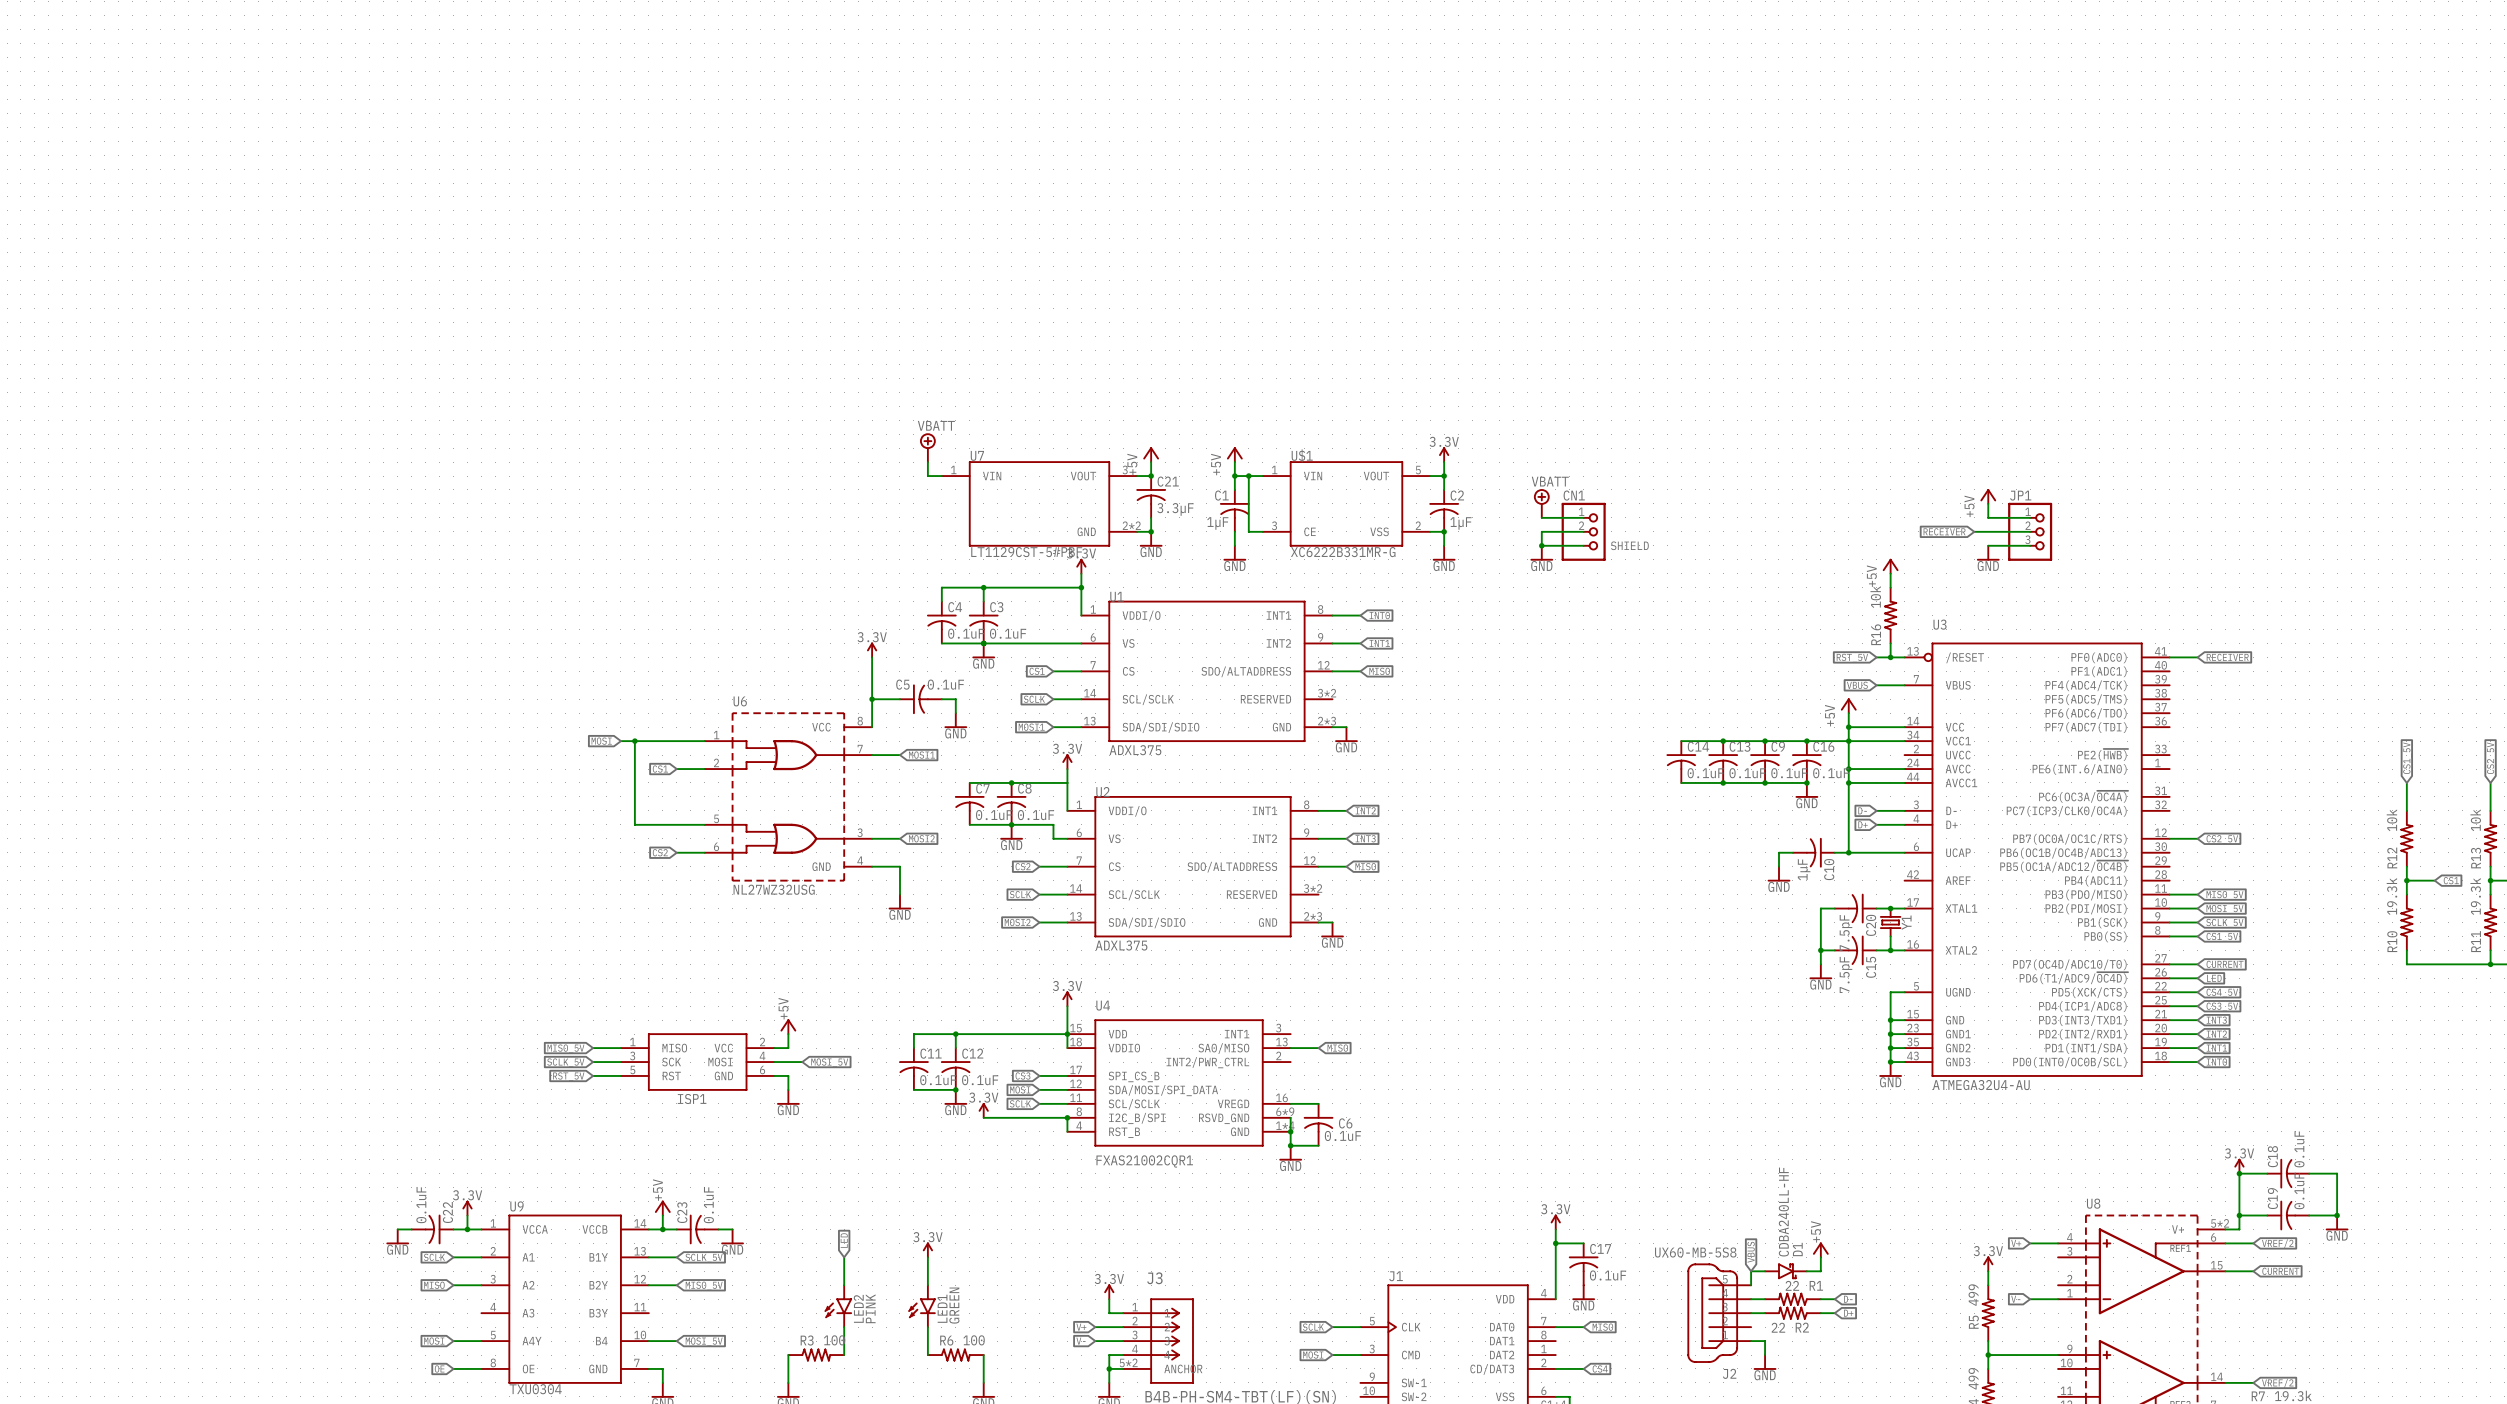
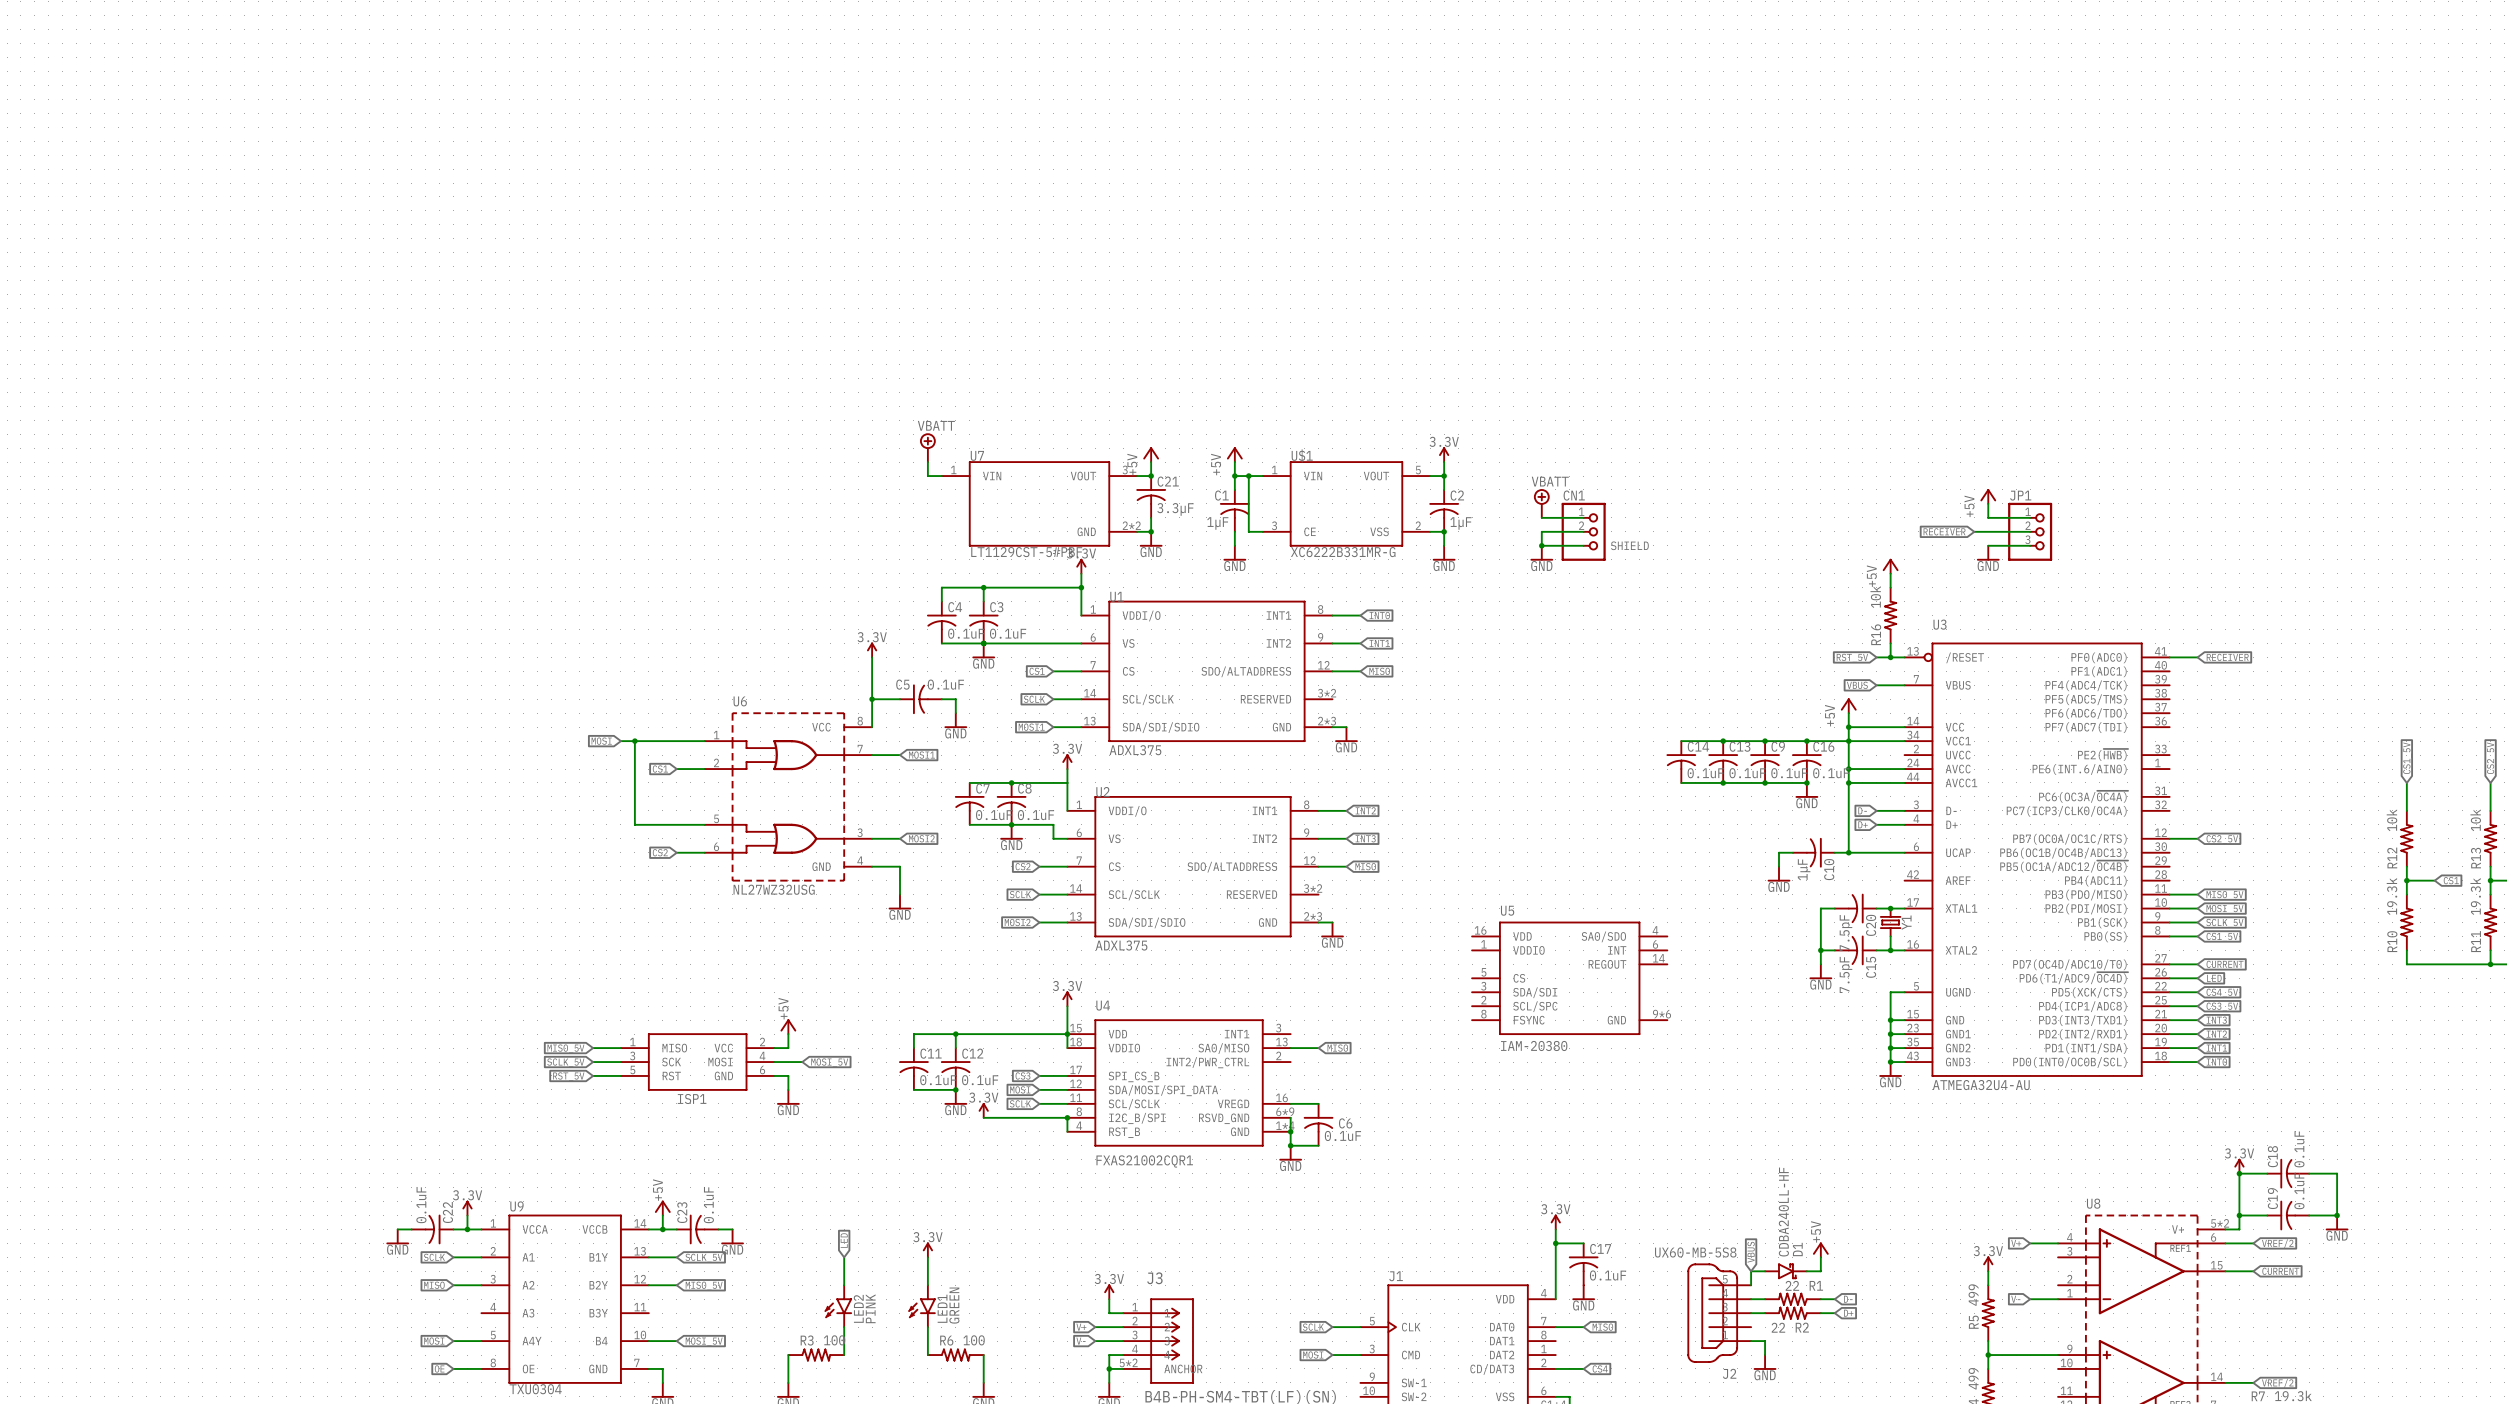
U5: none -> IAM-20380 (1569, 978)

